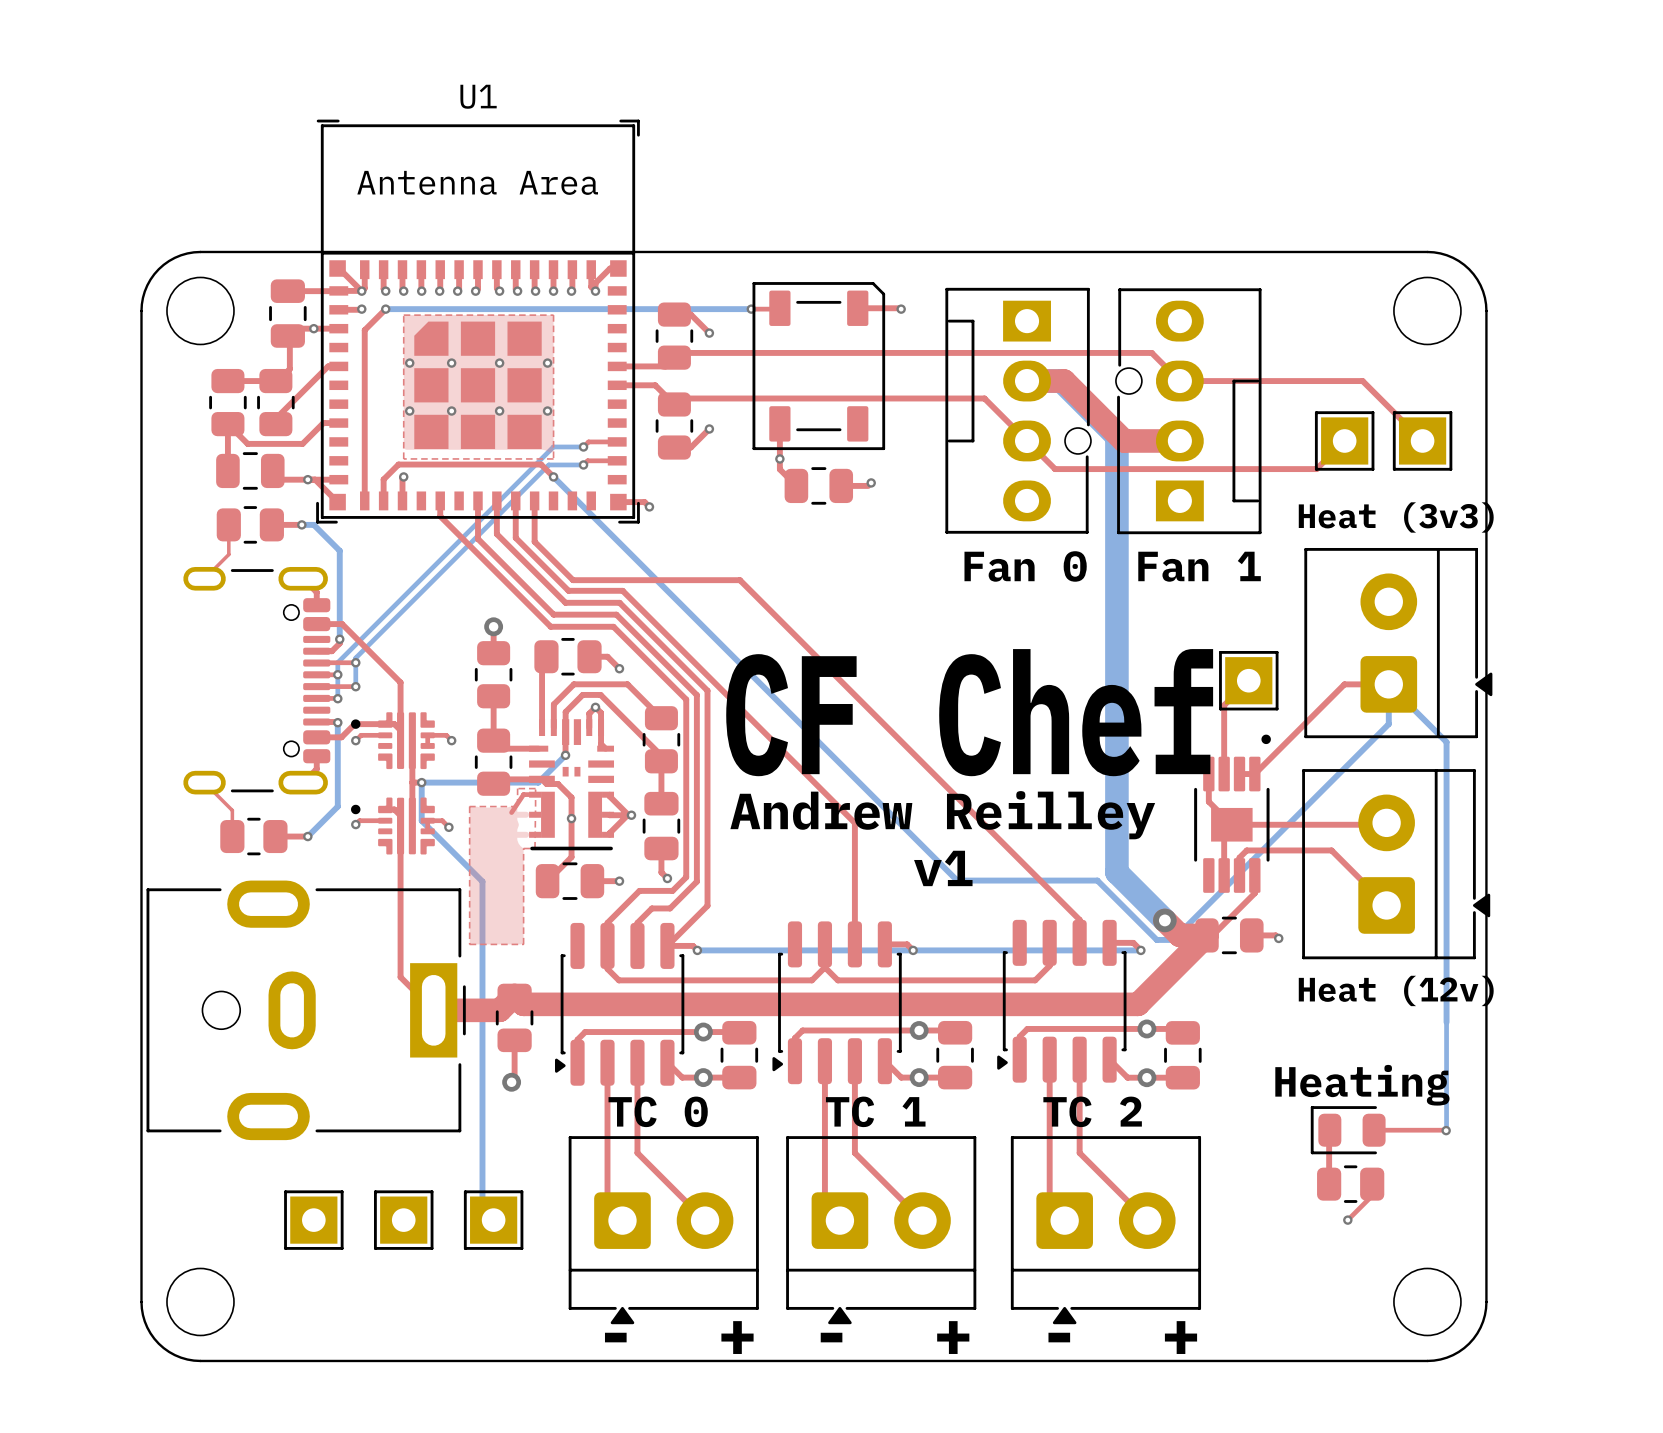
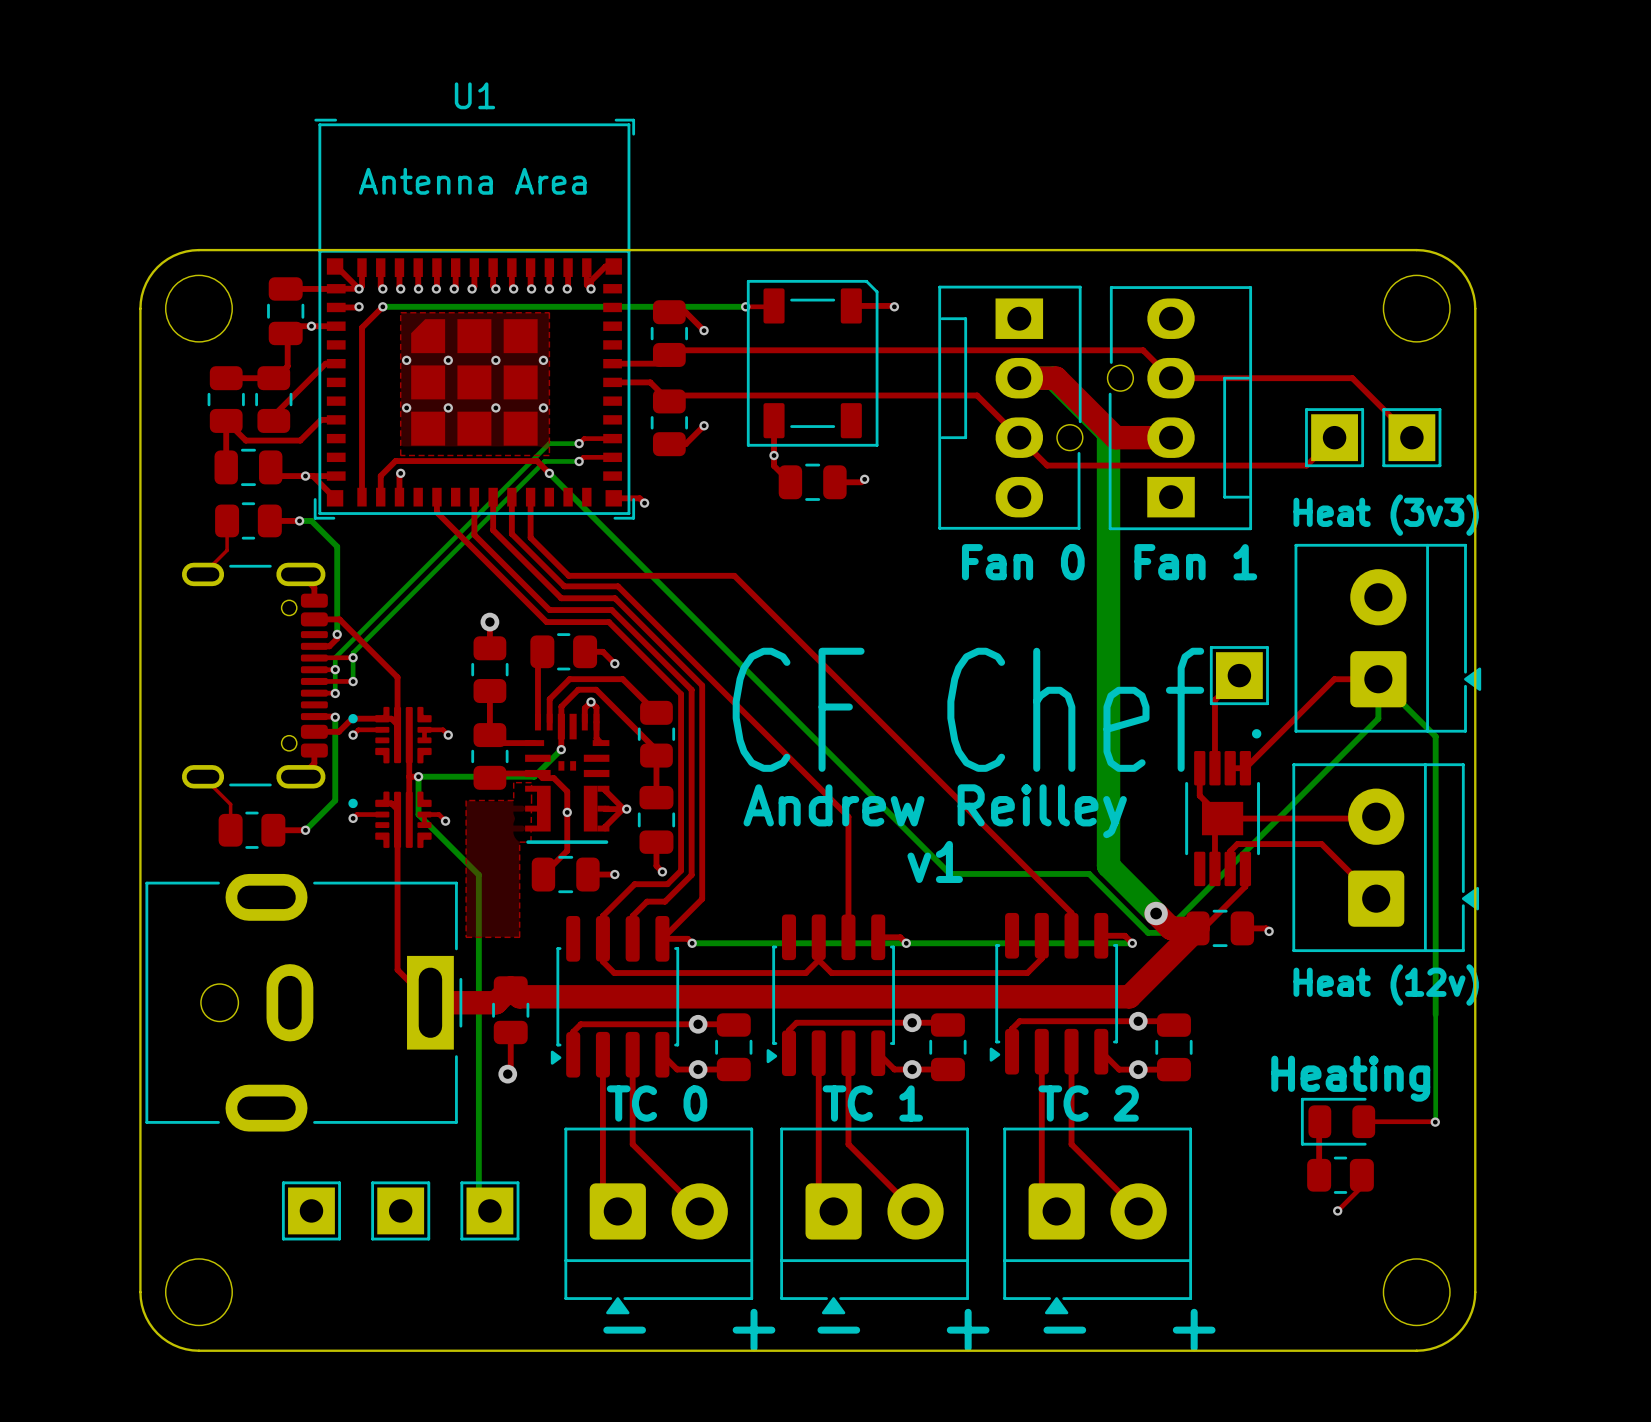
top track: (535, 794) (523, 794) (511, 812) -> none

